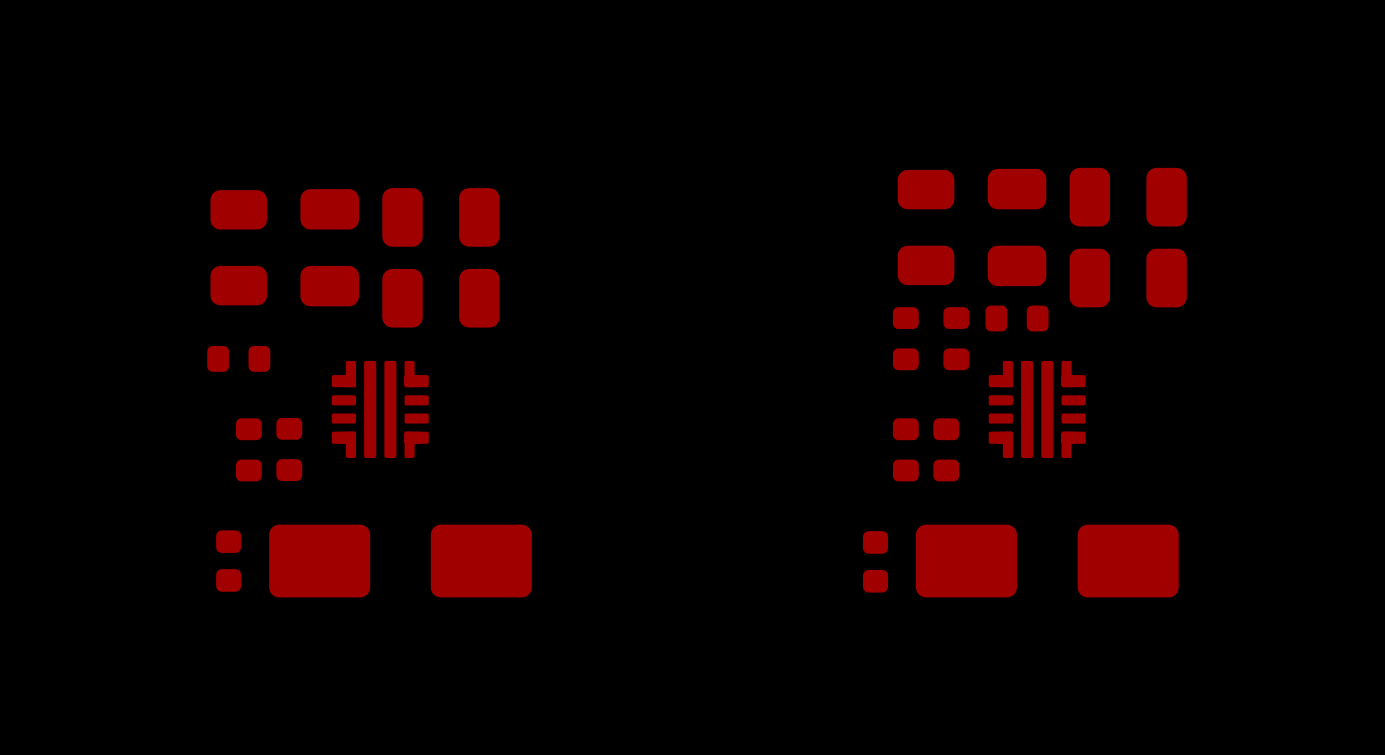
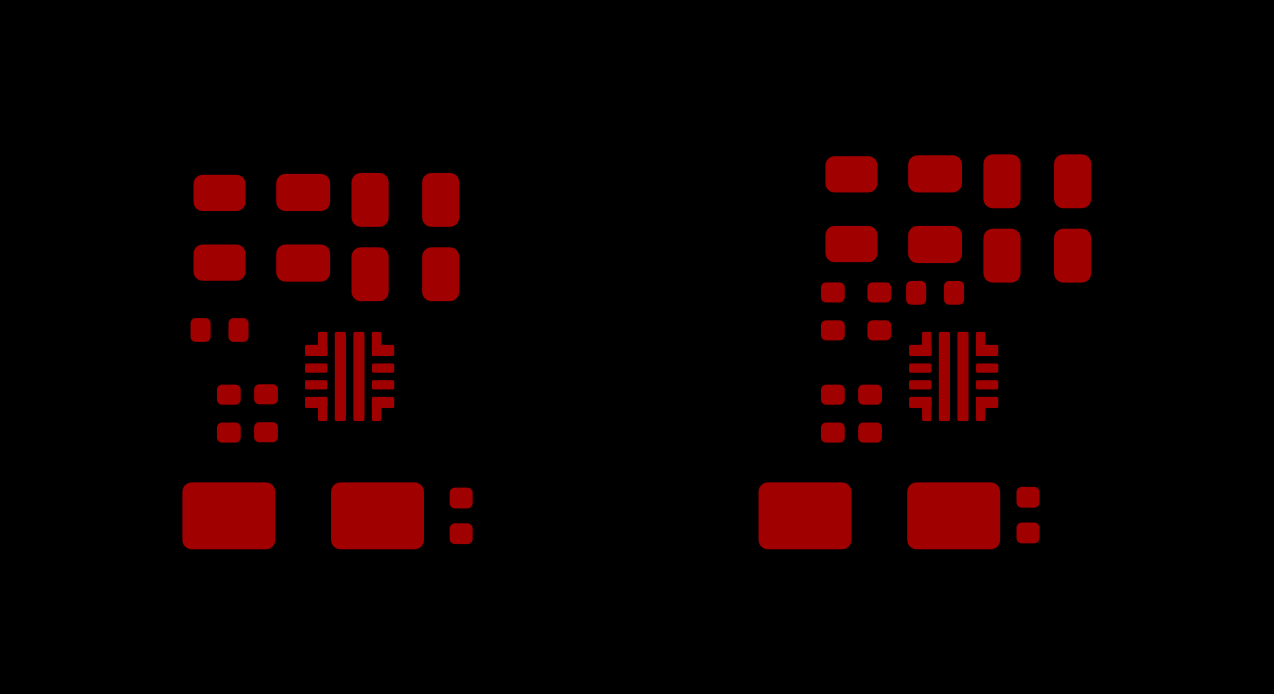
part: none -> (1028, 515)
part: (228, 561) -> none
part position: (400, 561) -> (303, 515)
part: none -> (461, 515)
part: (875, 561) -> none
part position: (1047, 561) -> (879, 515)

